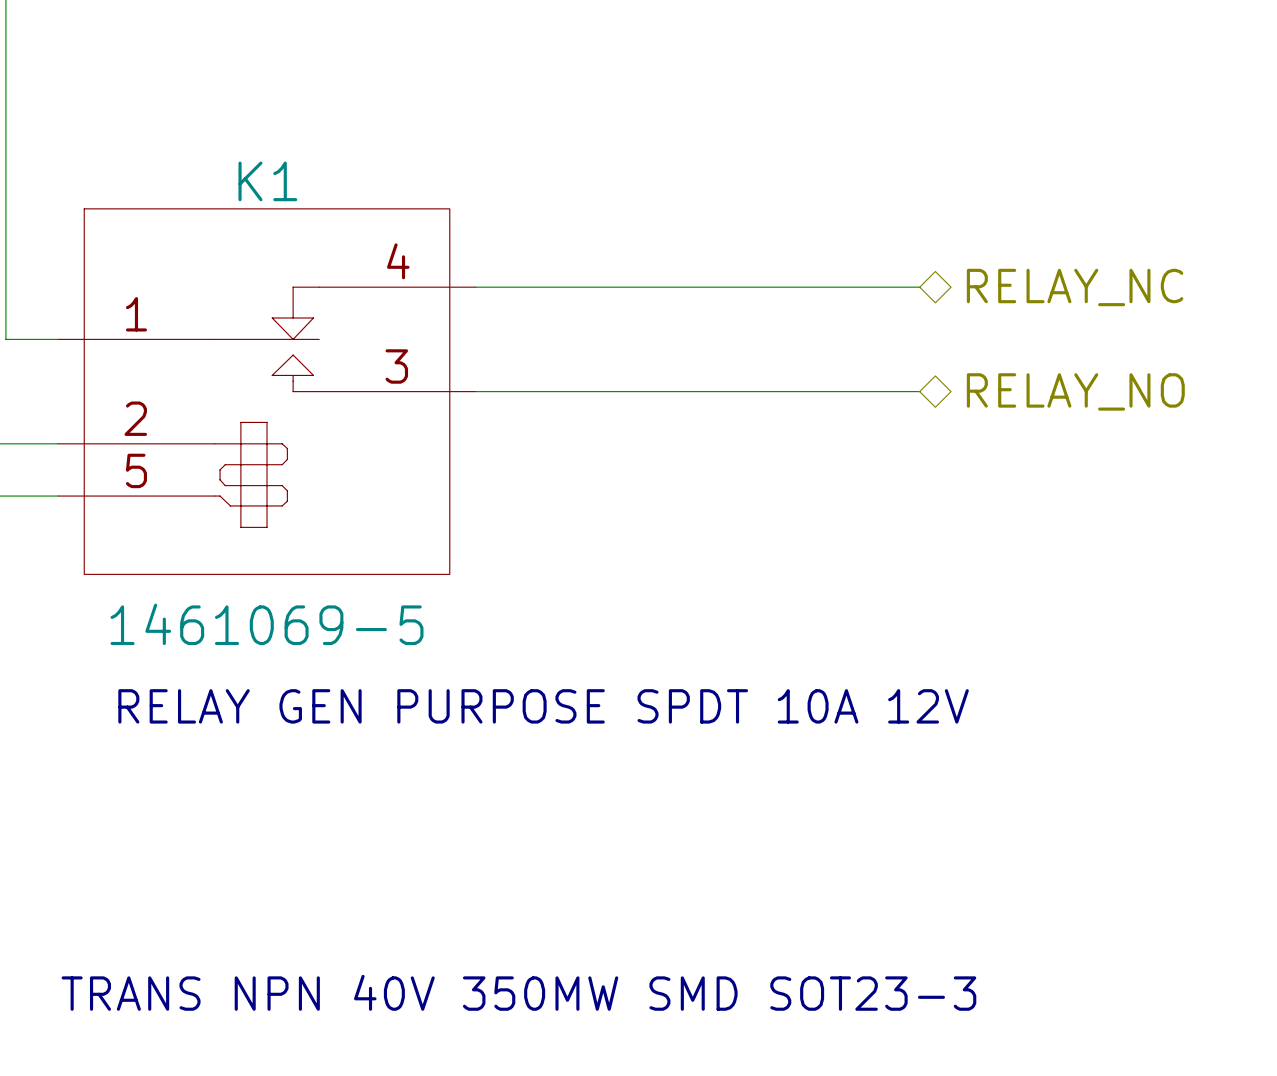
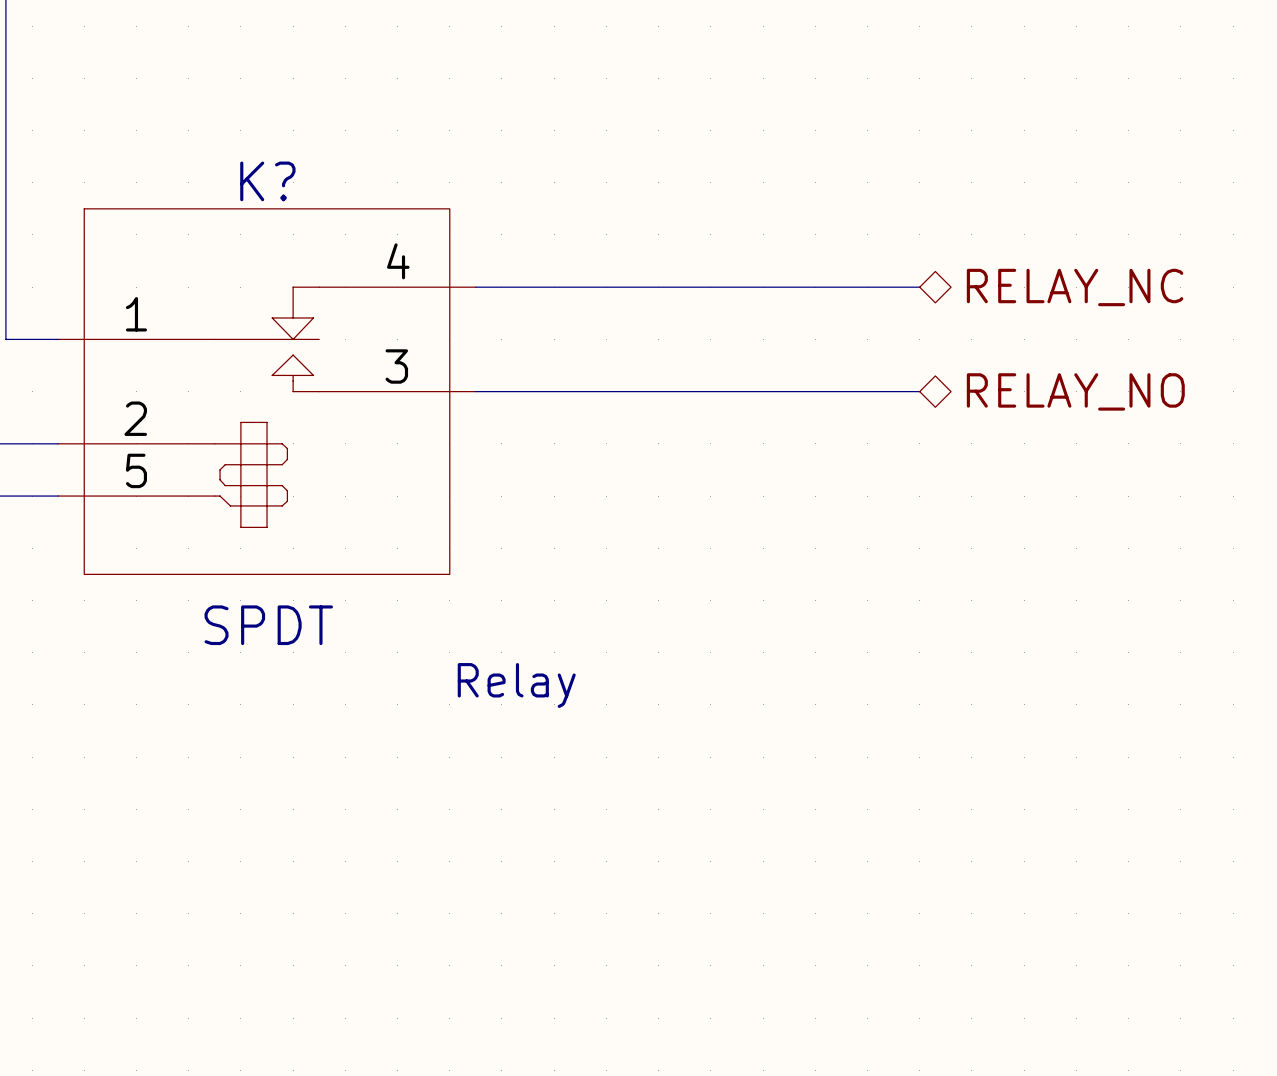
K1 name: K1 (267, 181) -> K? (267, 181)
K1 value: 1461069-5 (267, 624) -> SPDT (268, 625)
text: none -> Relay (516, 685)
text: RELAY GEN PURPOSE SPDT 10A 12V (543, 706) -> none
text: TRANS NPN 40V 350MW SMD SOT23-3 (518, 992) -> none

